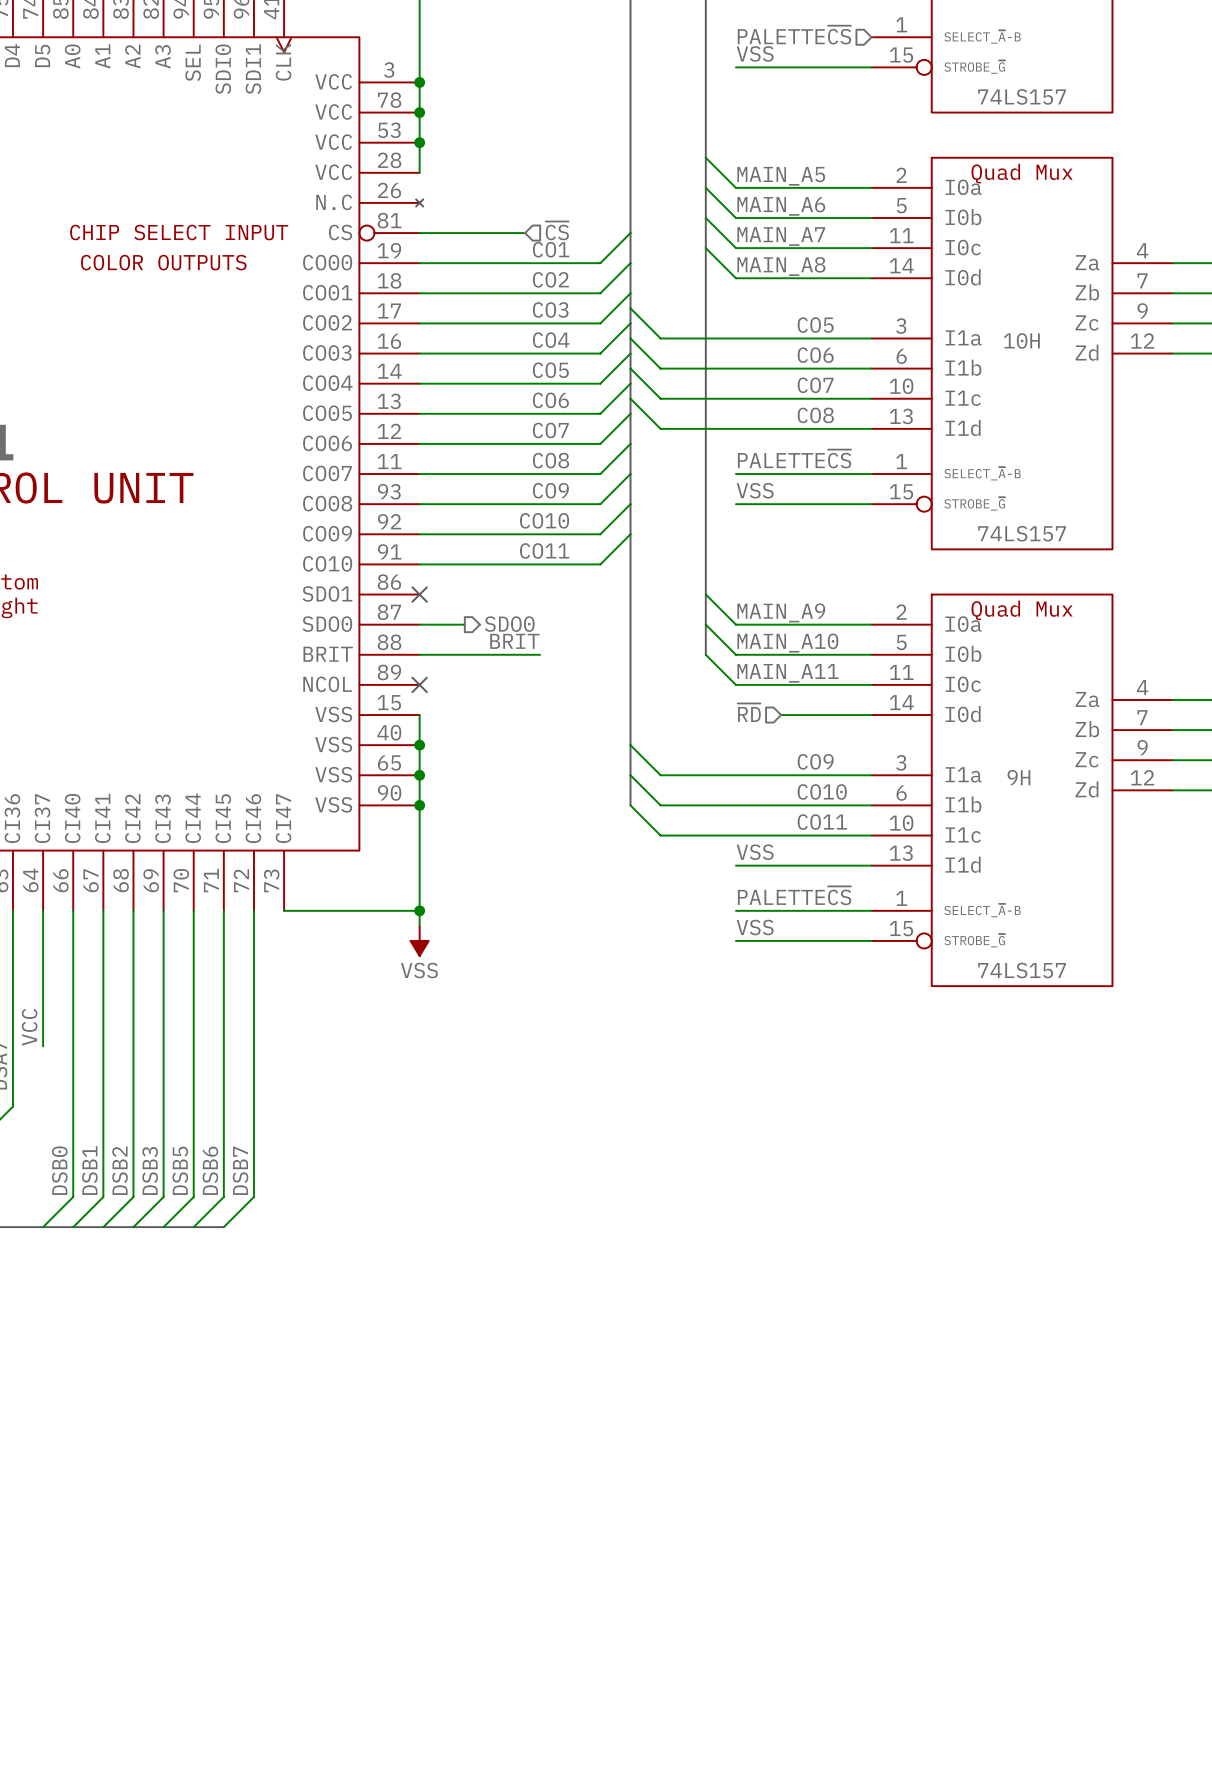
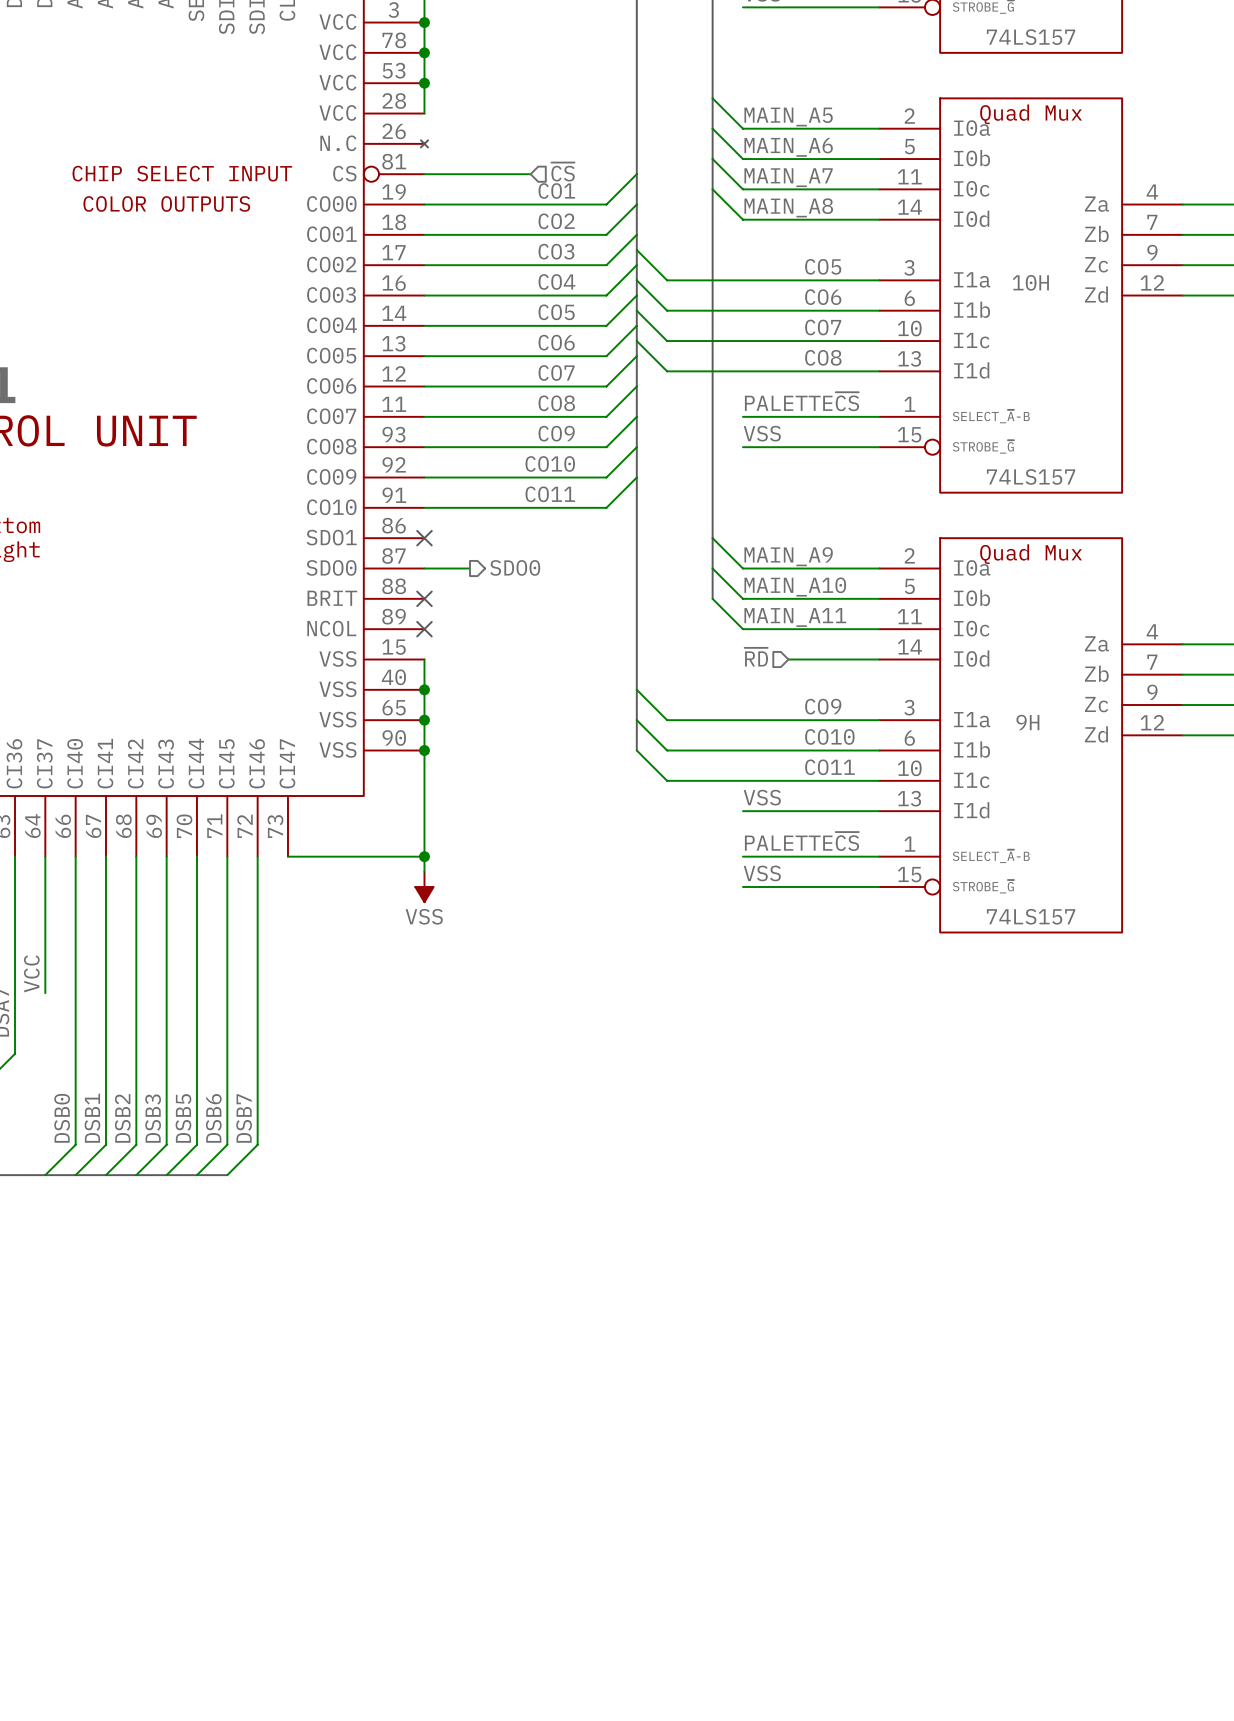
label: BRIT (514, 641) -> none
wire: (419, 654) (540, 654) -> none
no-connect mark: none -> (424, 598)

